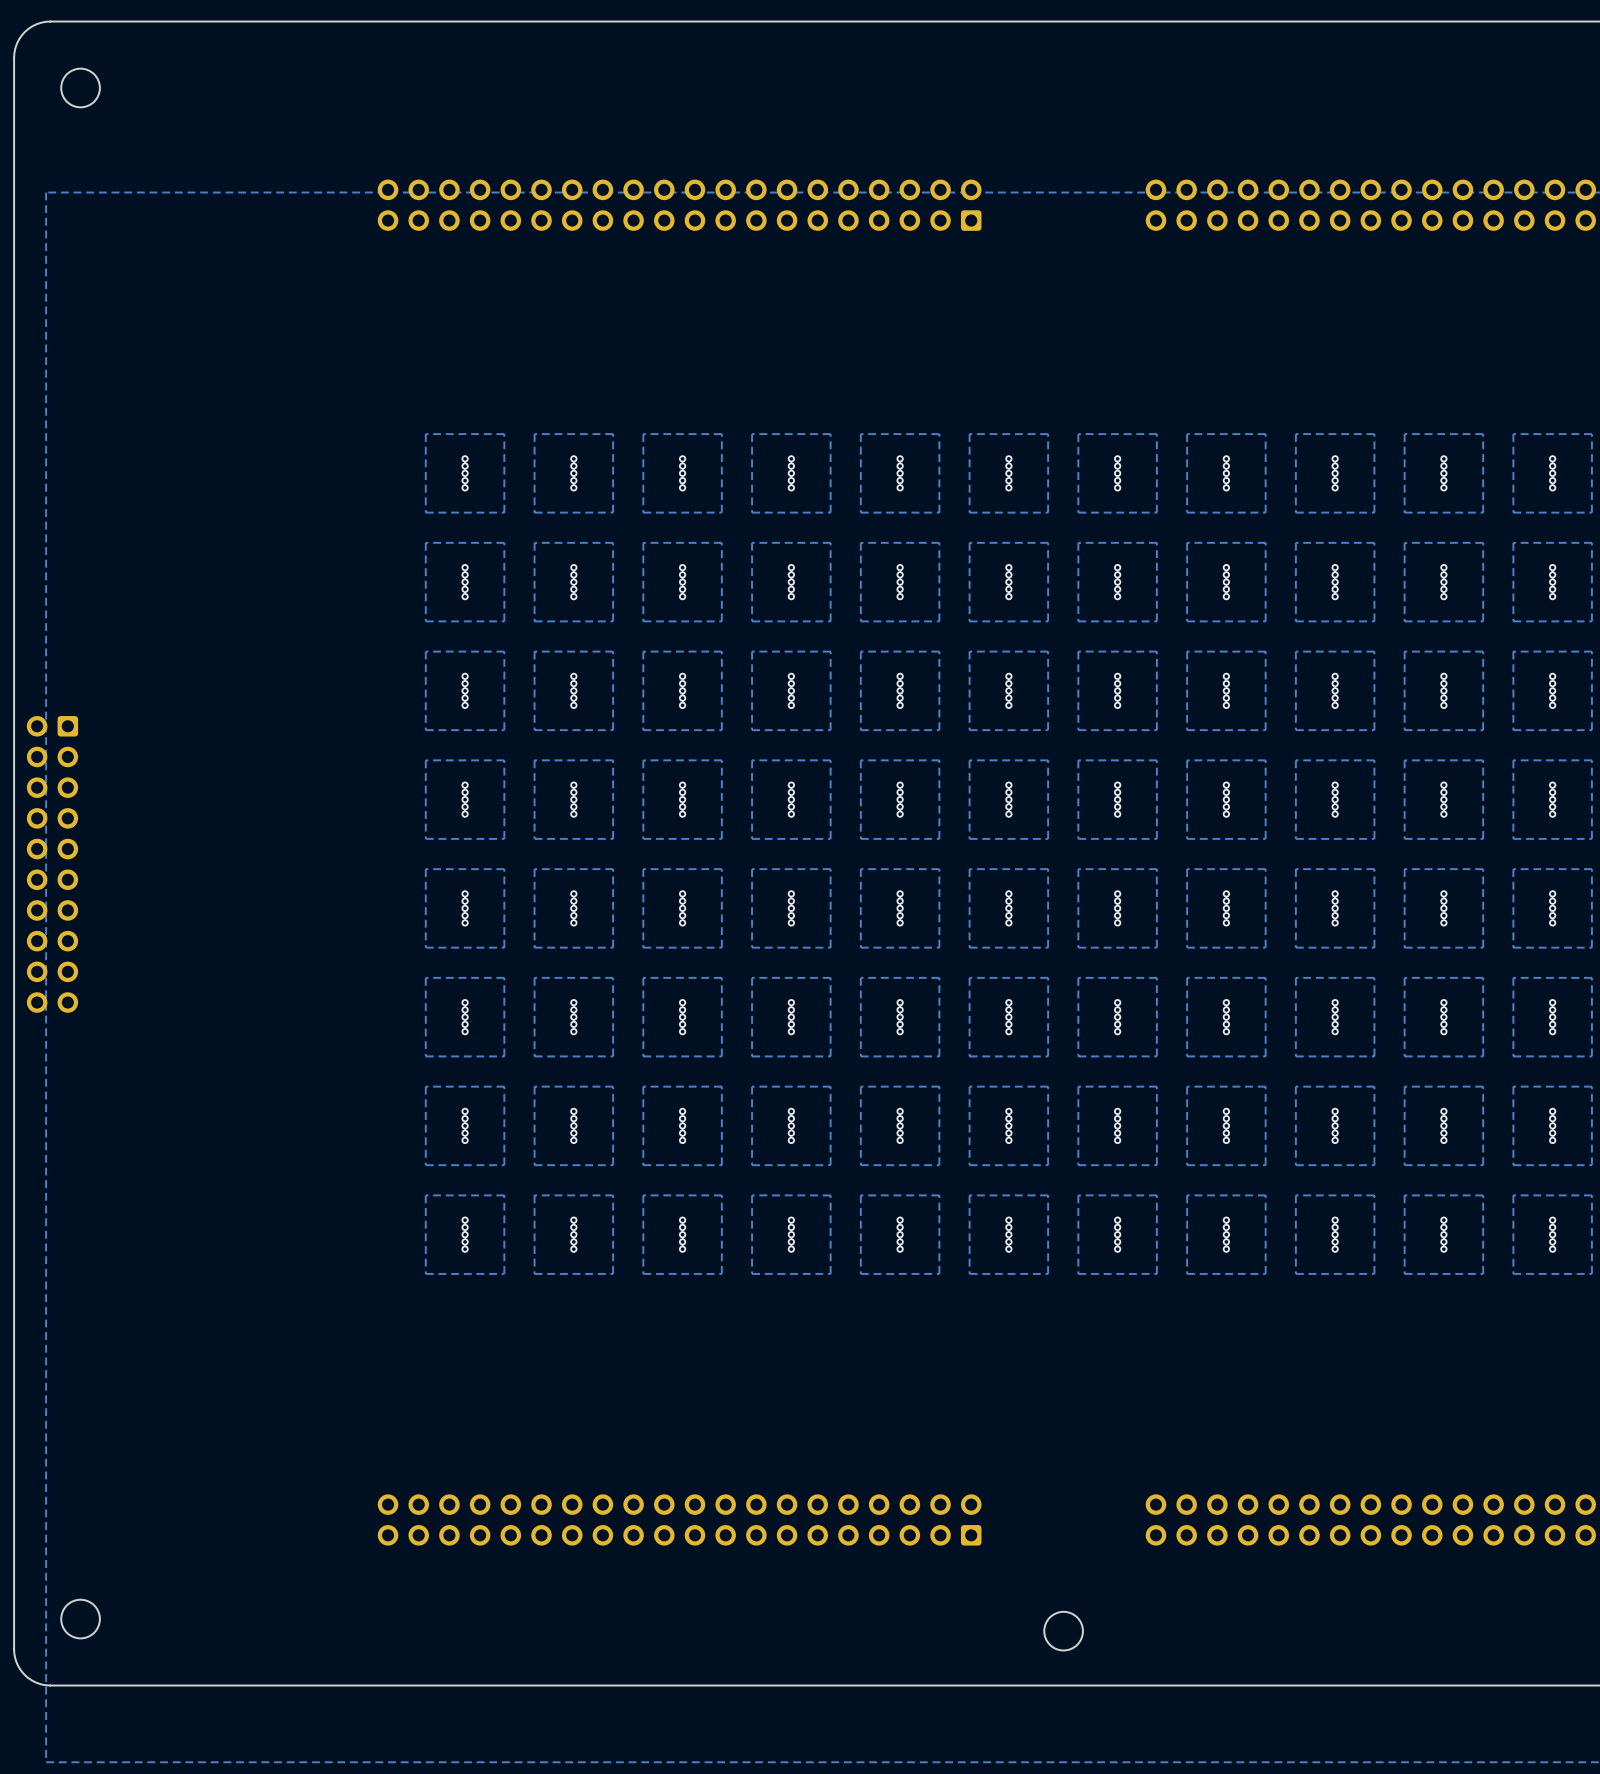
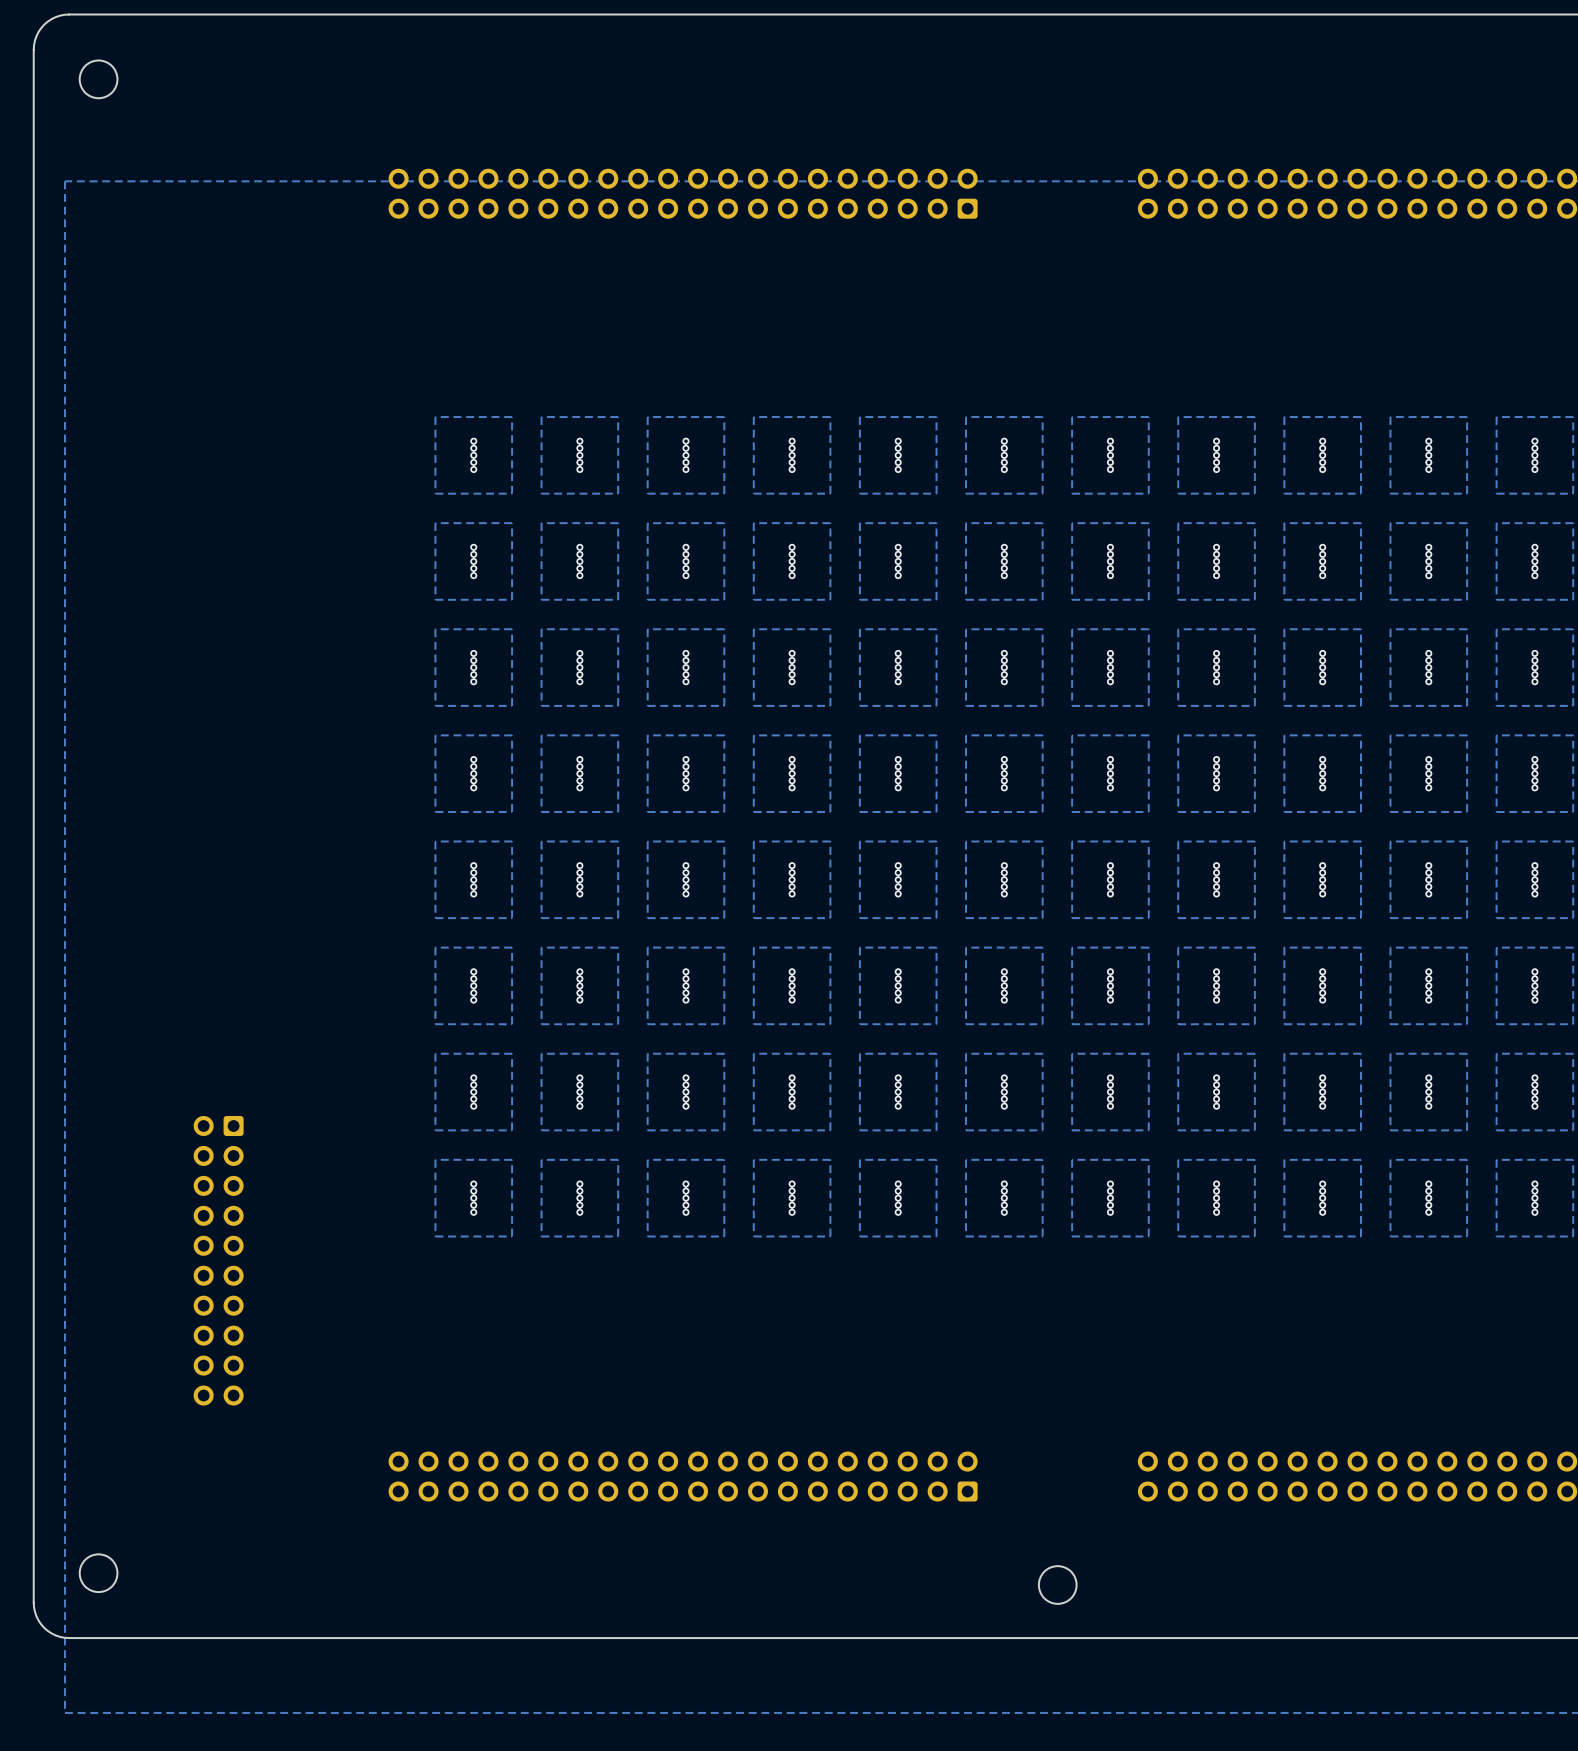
part: (52, 864) -> none
part: none -> (218, 1260)

